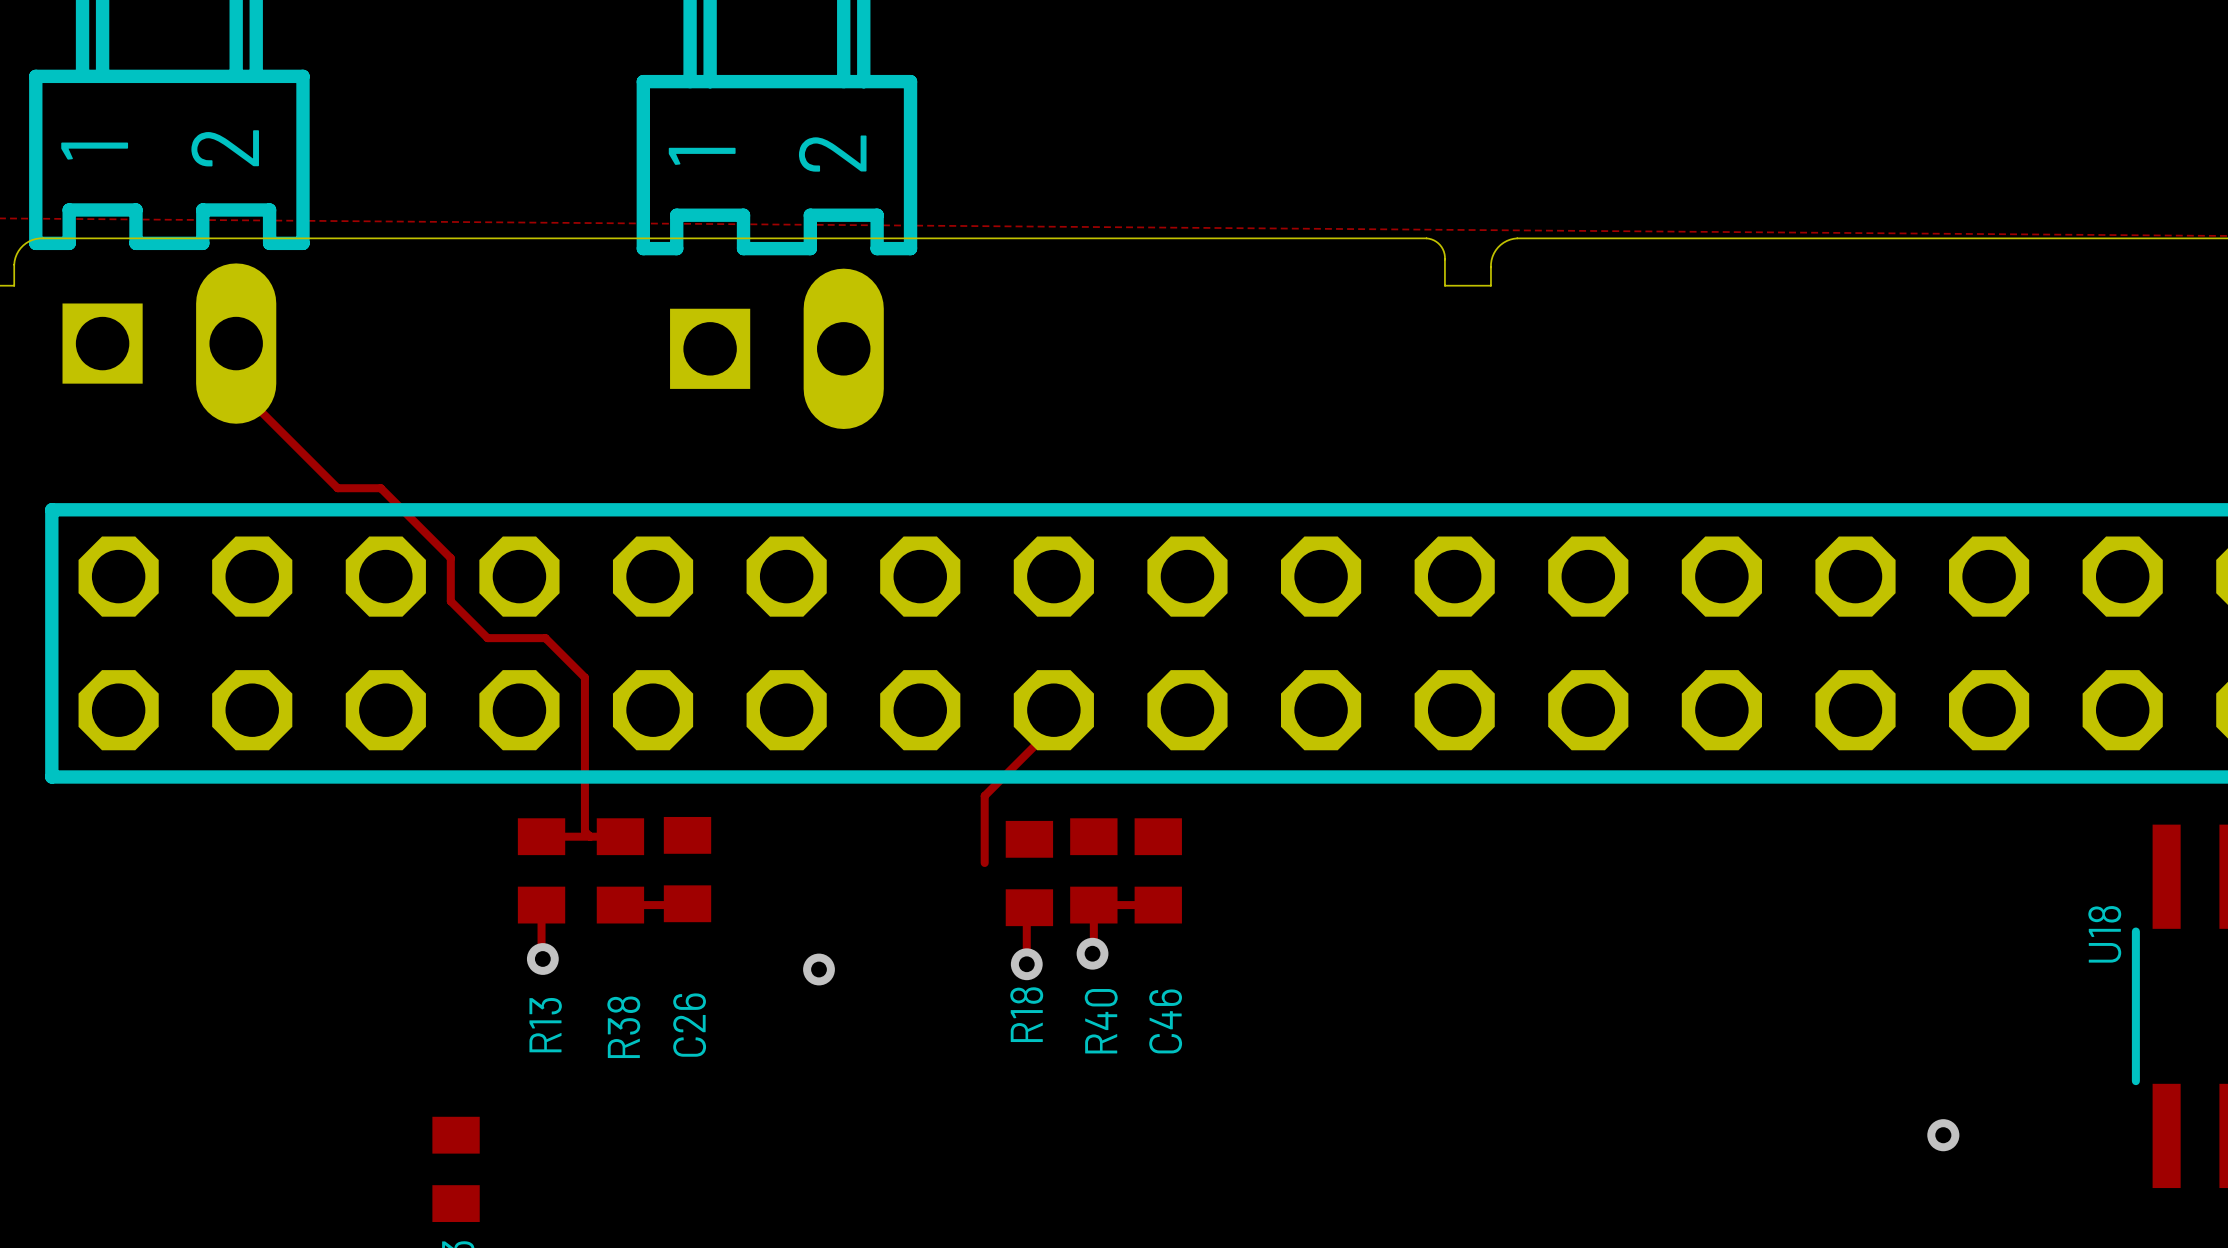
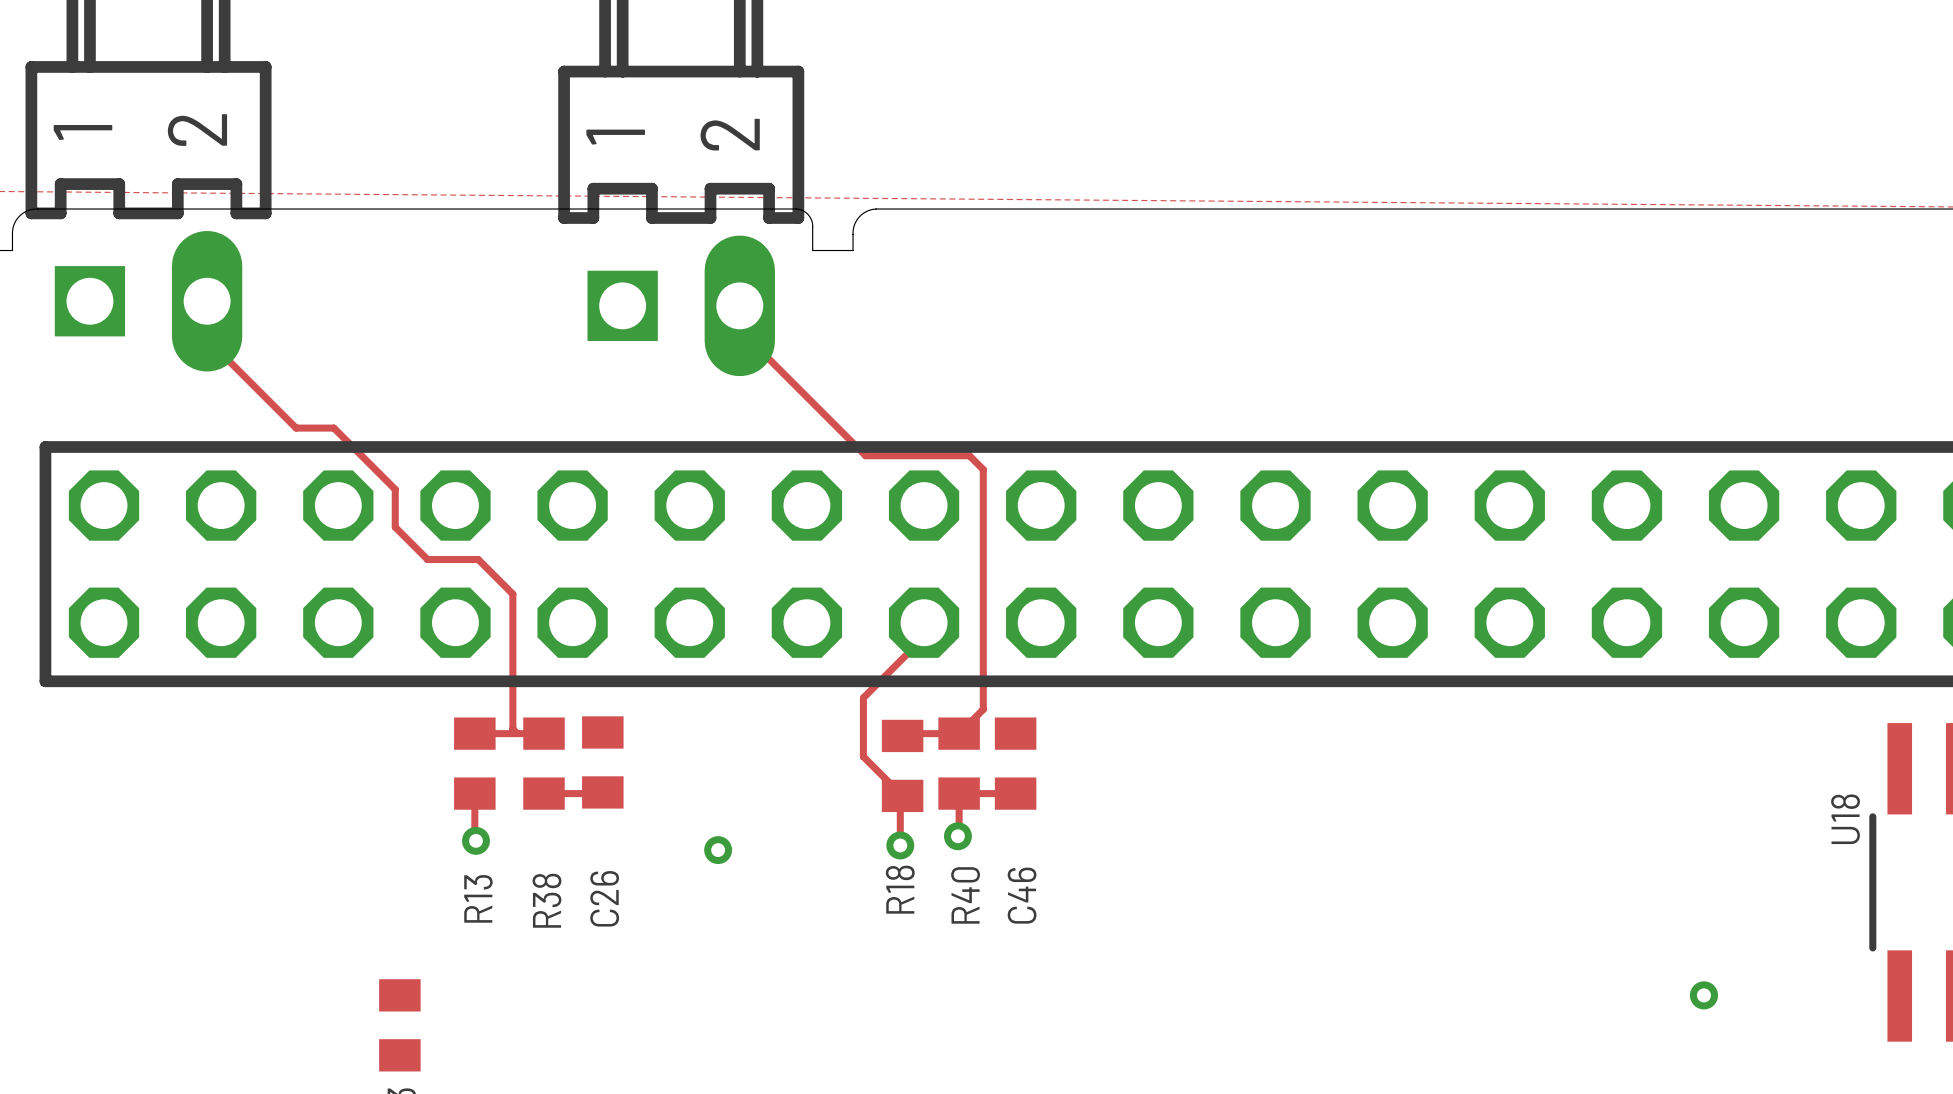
board edge: (908, 238) (999, 238) -> (796, 209) (805, 211) (811, 220) (812, 250) (853, 250) (853, 231) (855, 222) (864, 212) (876, 209)
board edge: (1426, 238) (1436, 241) (1443, 251) (1444, 285) (1490, 285) (1491, 263) (1494, 253) (1503, 242) (1517, 238) -> (1250, 209) (1330, 209)
track: none -> (739, 305) (739, 329) (865, 455) (969, 455) (983, 469) (983, 709) (959, 733) (904, 733) (902, 735)
track: none -> (863, 756) (902, 795) (900, 798)

